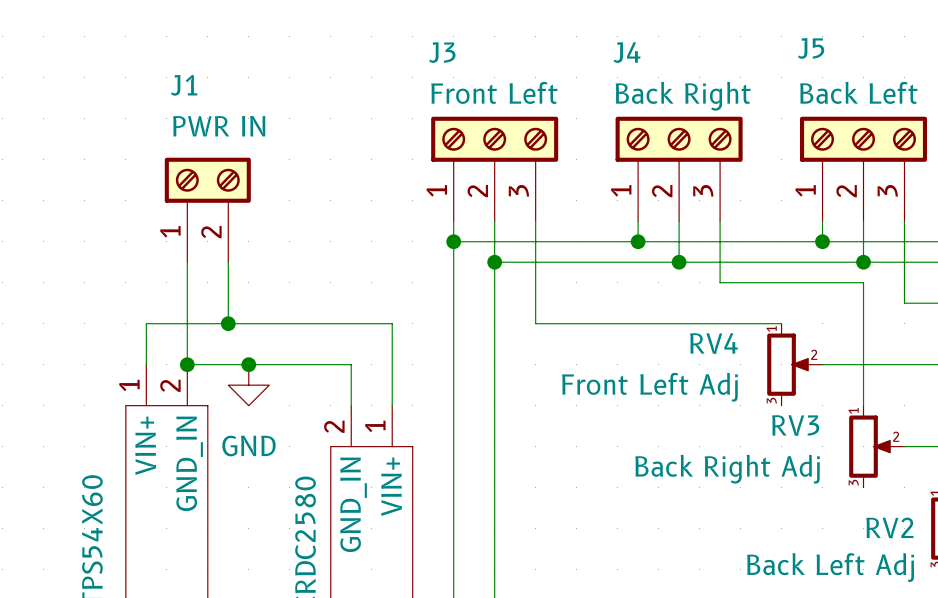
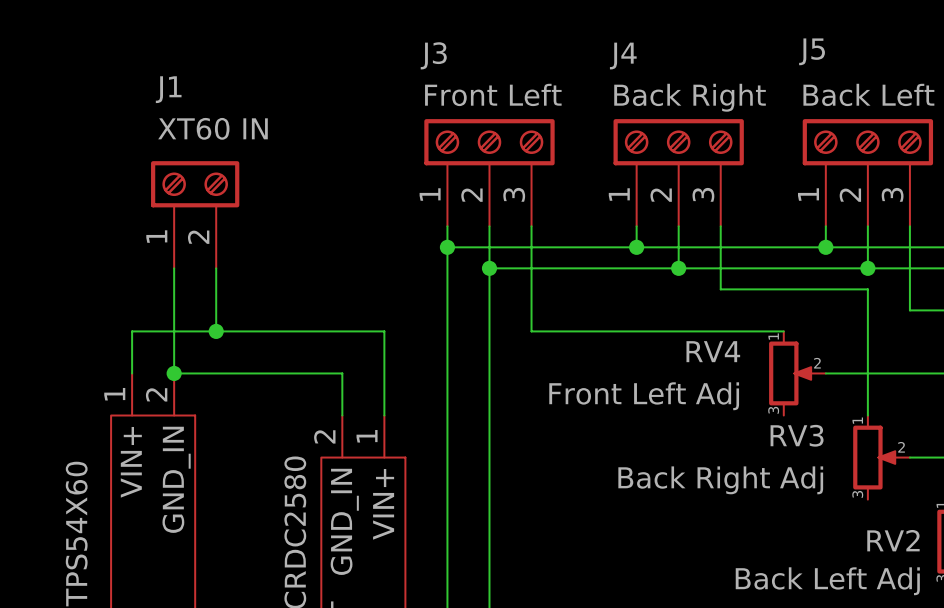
J1 value: PWR IN (219, 126) -> XT60 IN (213, 128)
junction: (248, 364) -> none
power symbol: GND (248, 385) -> none

